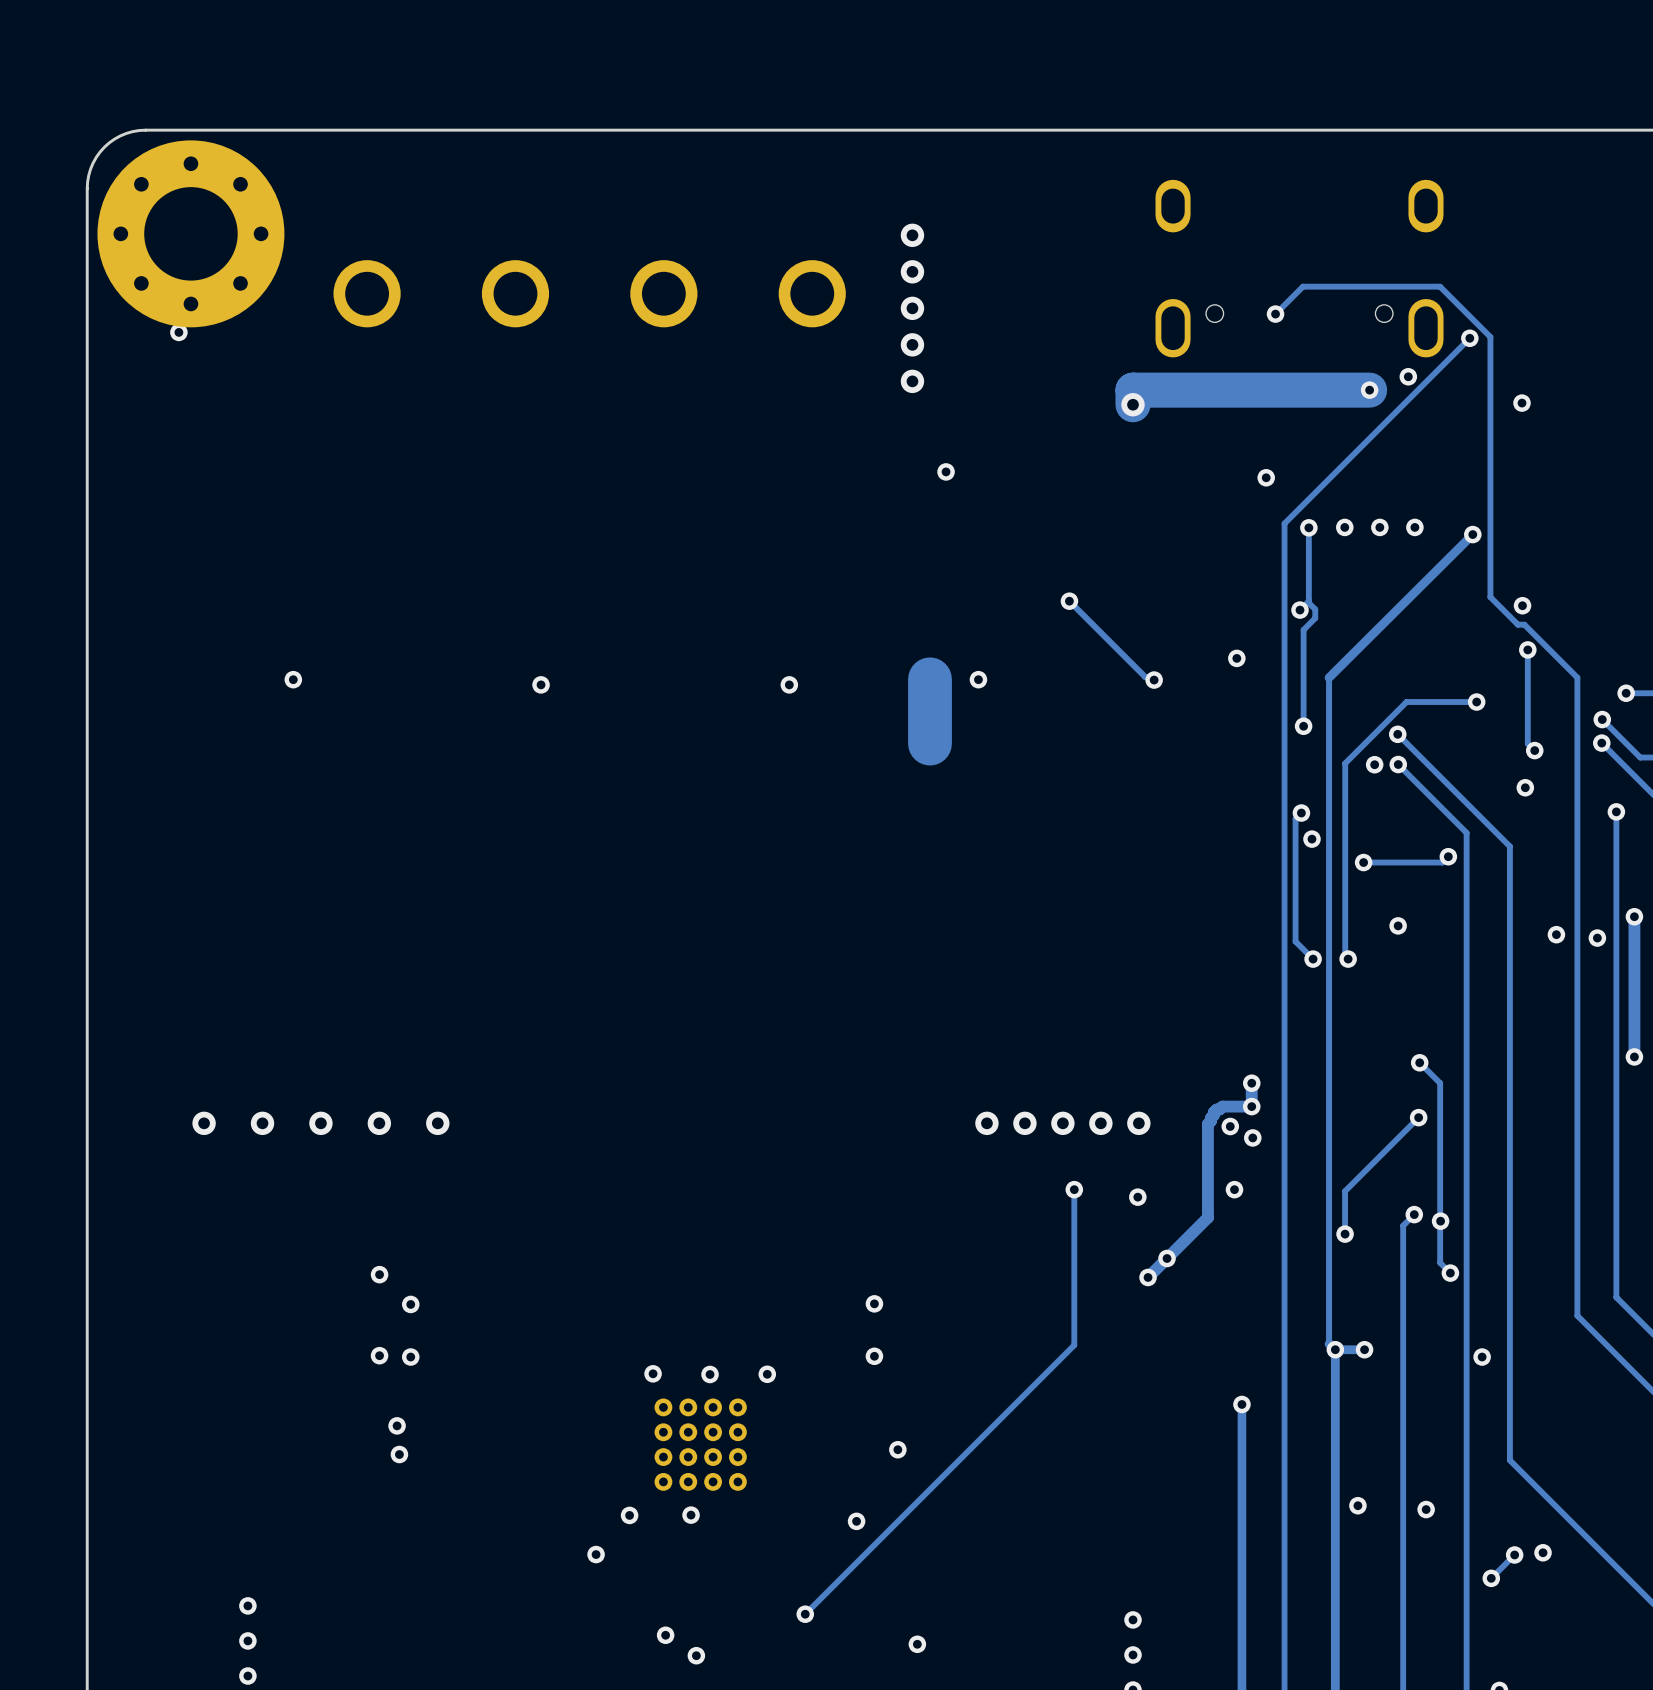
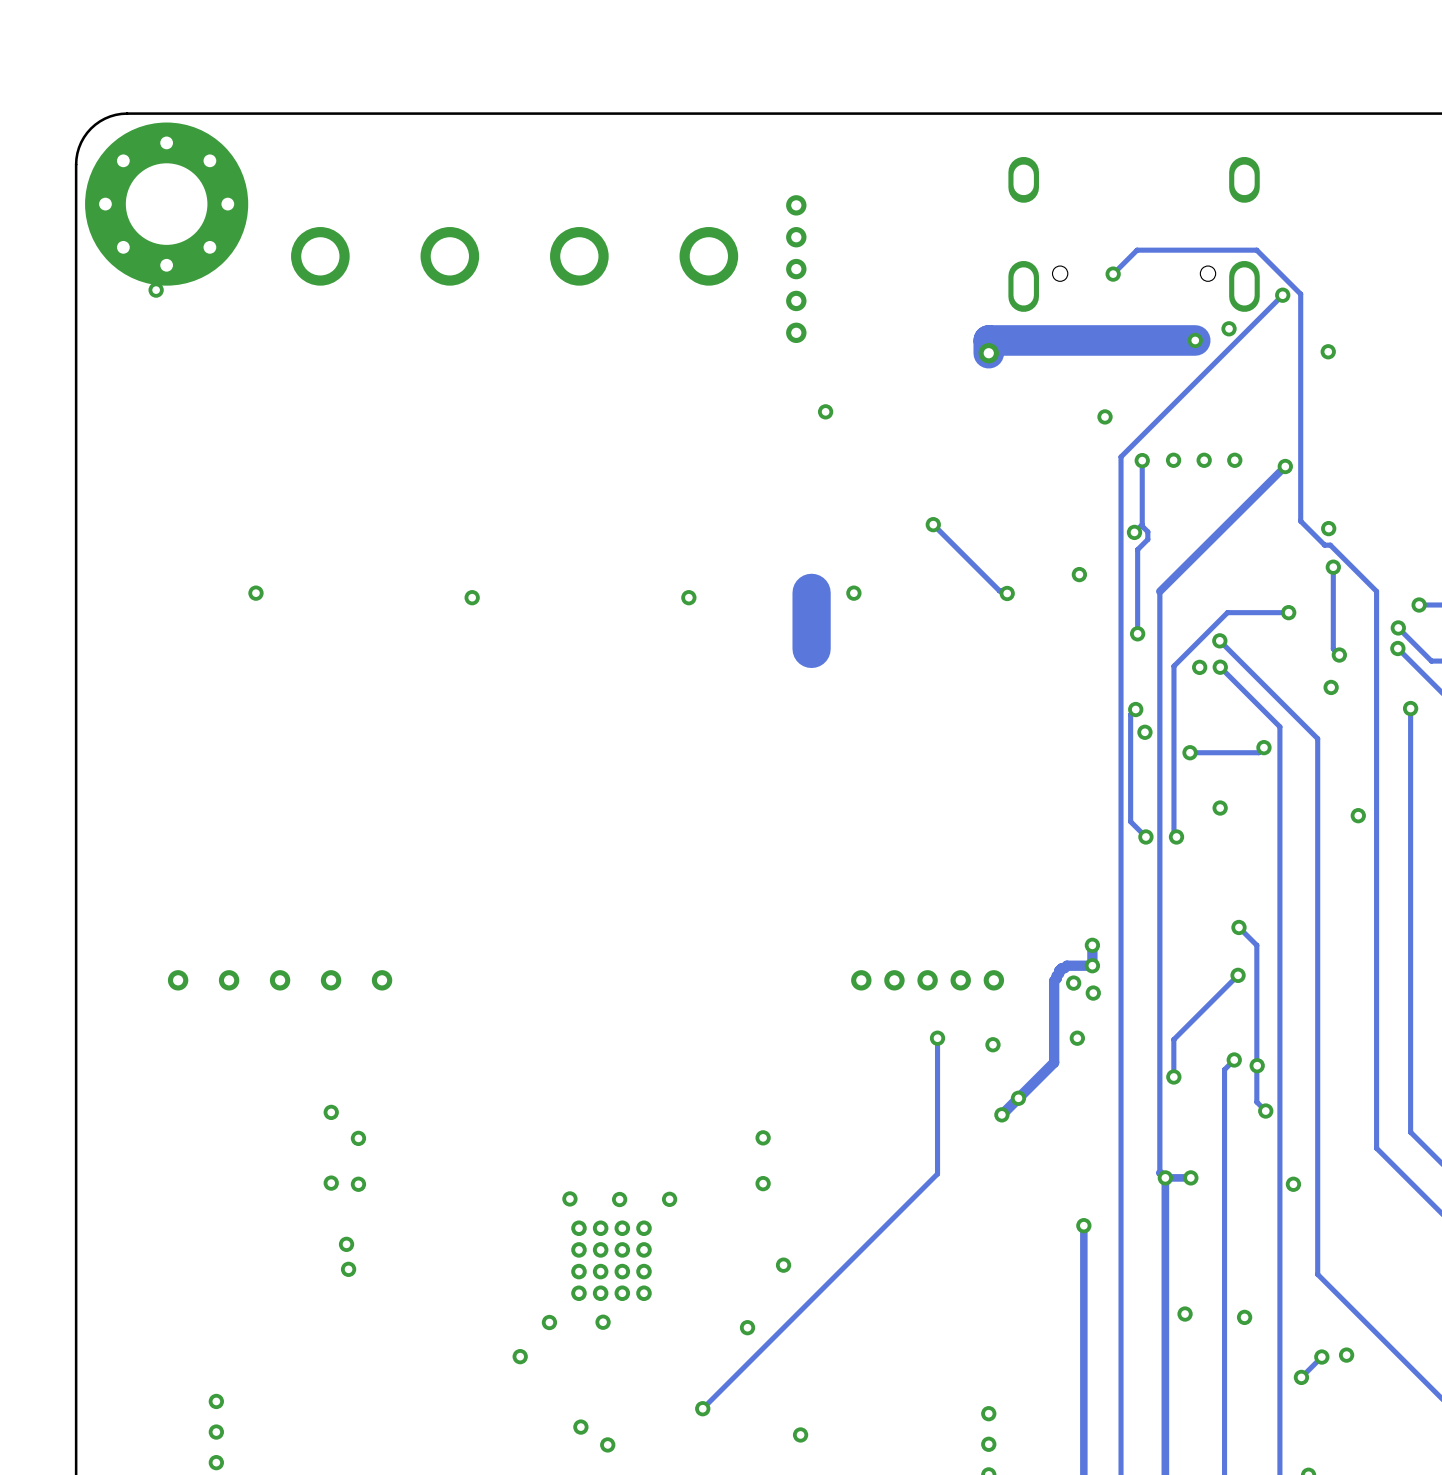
track: (1634, 916) (1634, 1056) -> none
via: (1634, 916) -> none
via: (1597, 938) -> none
via: (1634, 1056) -> none

